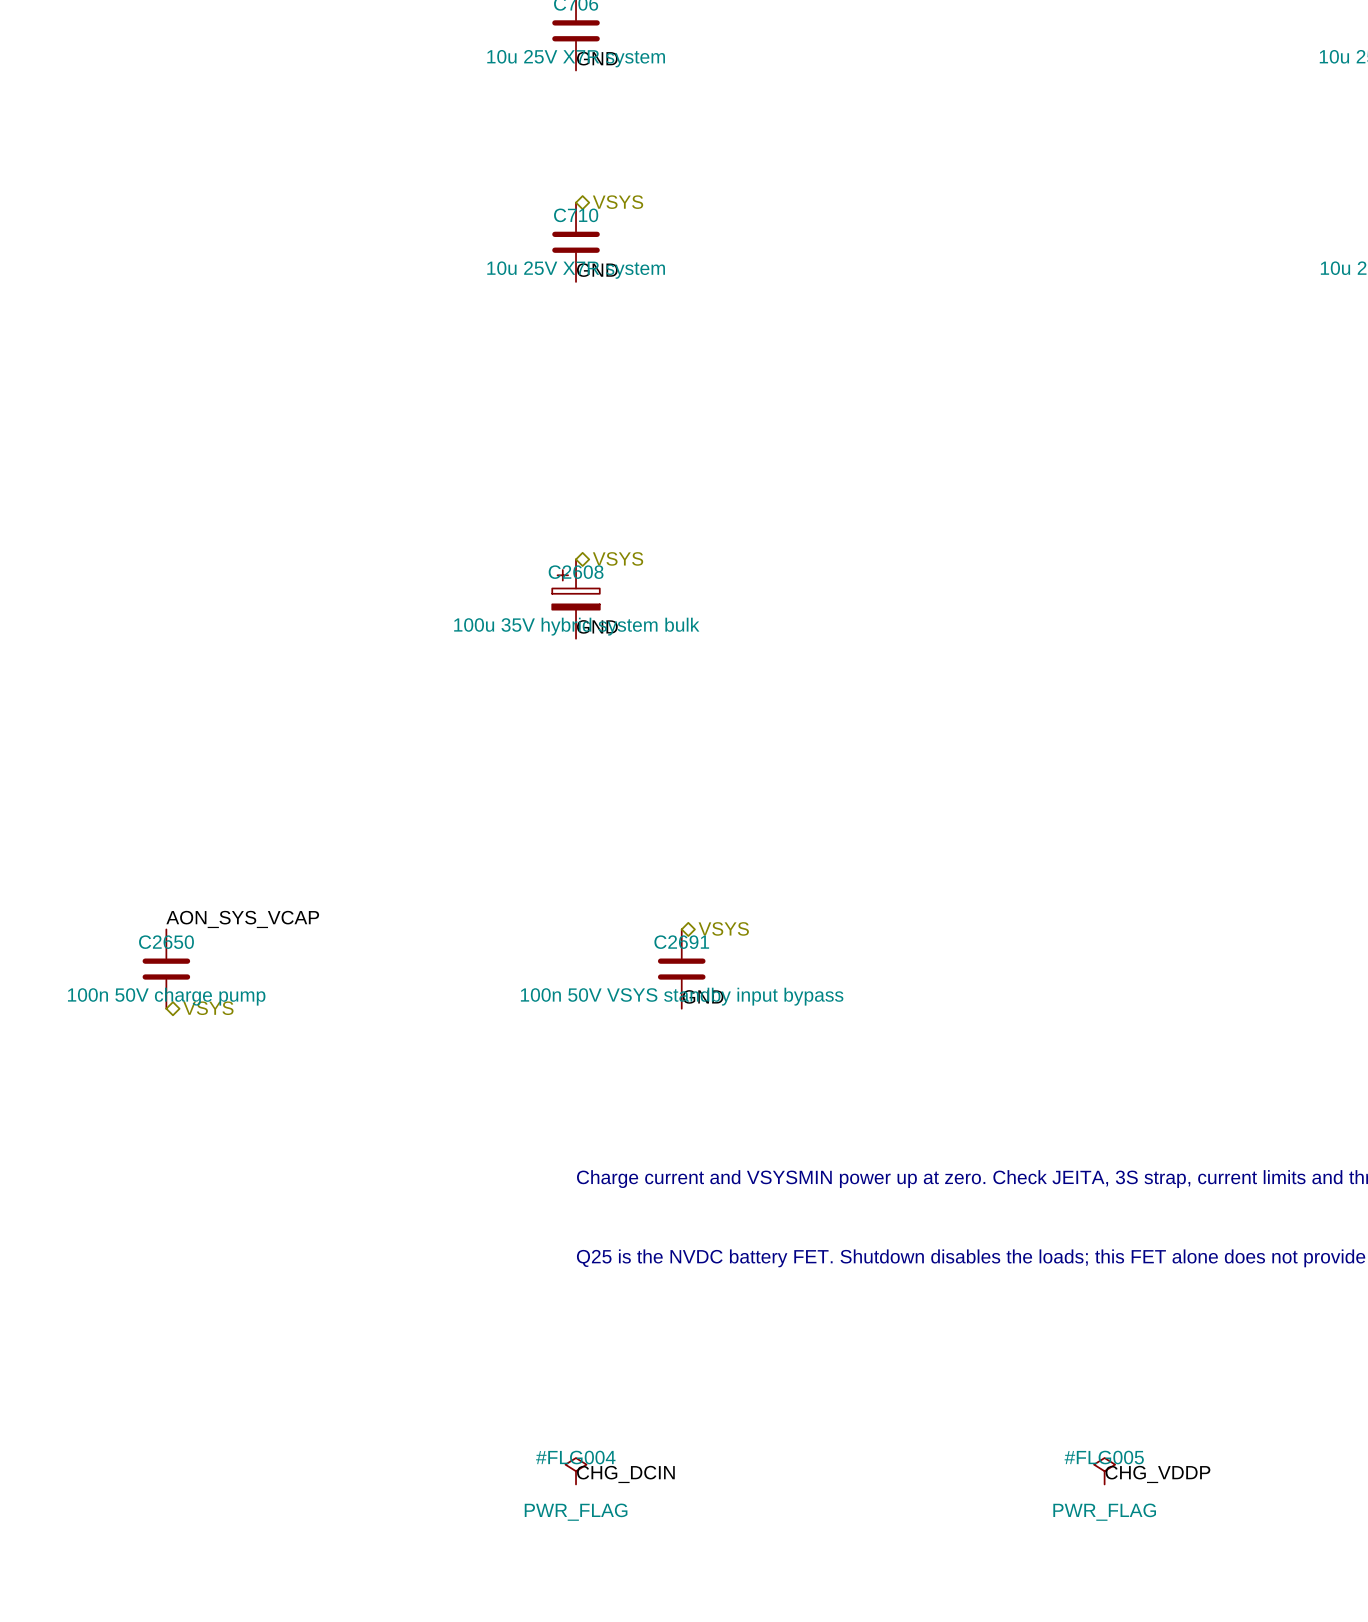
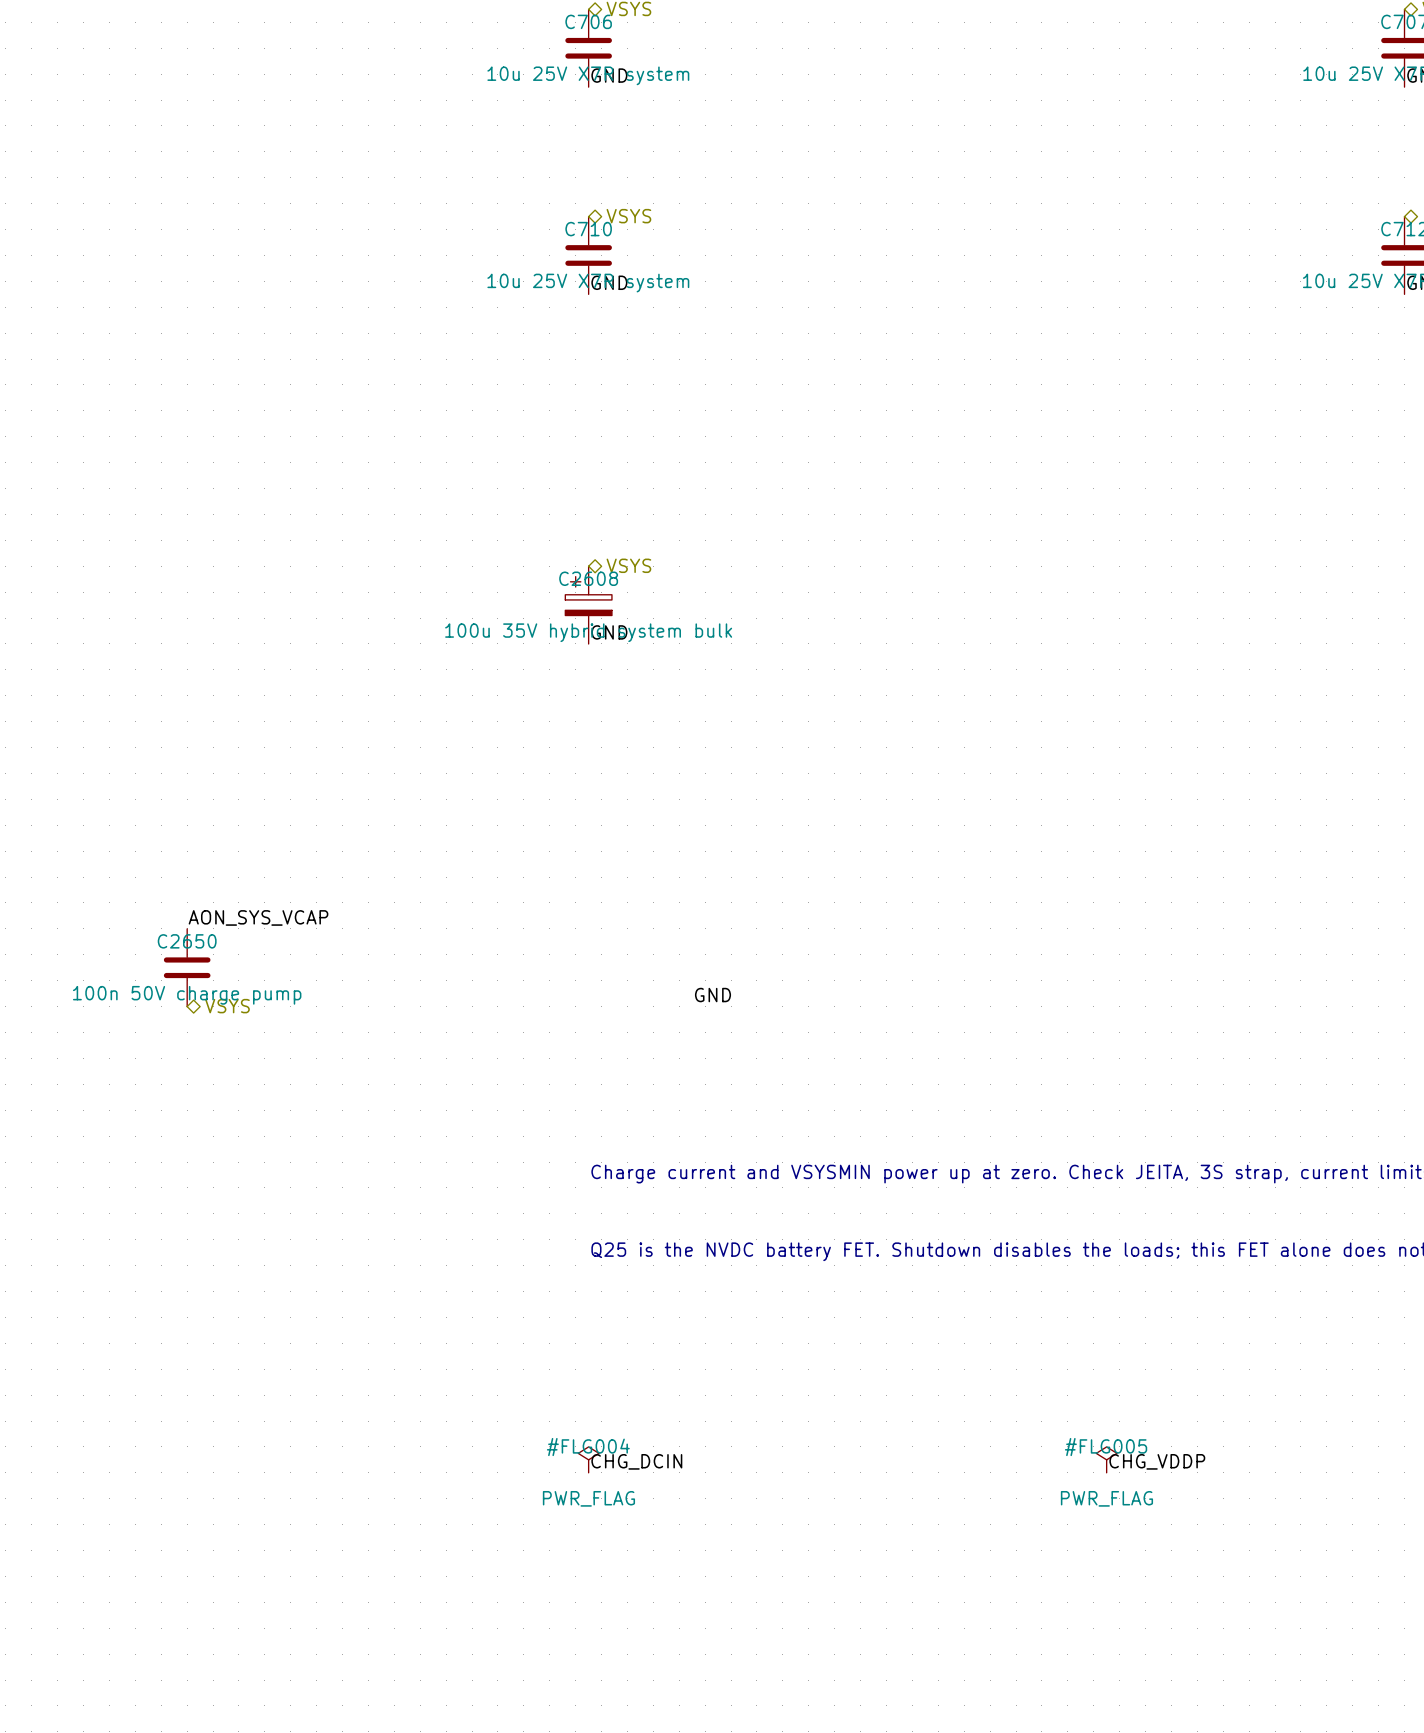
hierarchical label: VSYS (723, 928) -> none
C2691: 100n 50V VSYS standby input bypass (681, 969) -> none

